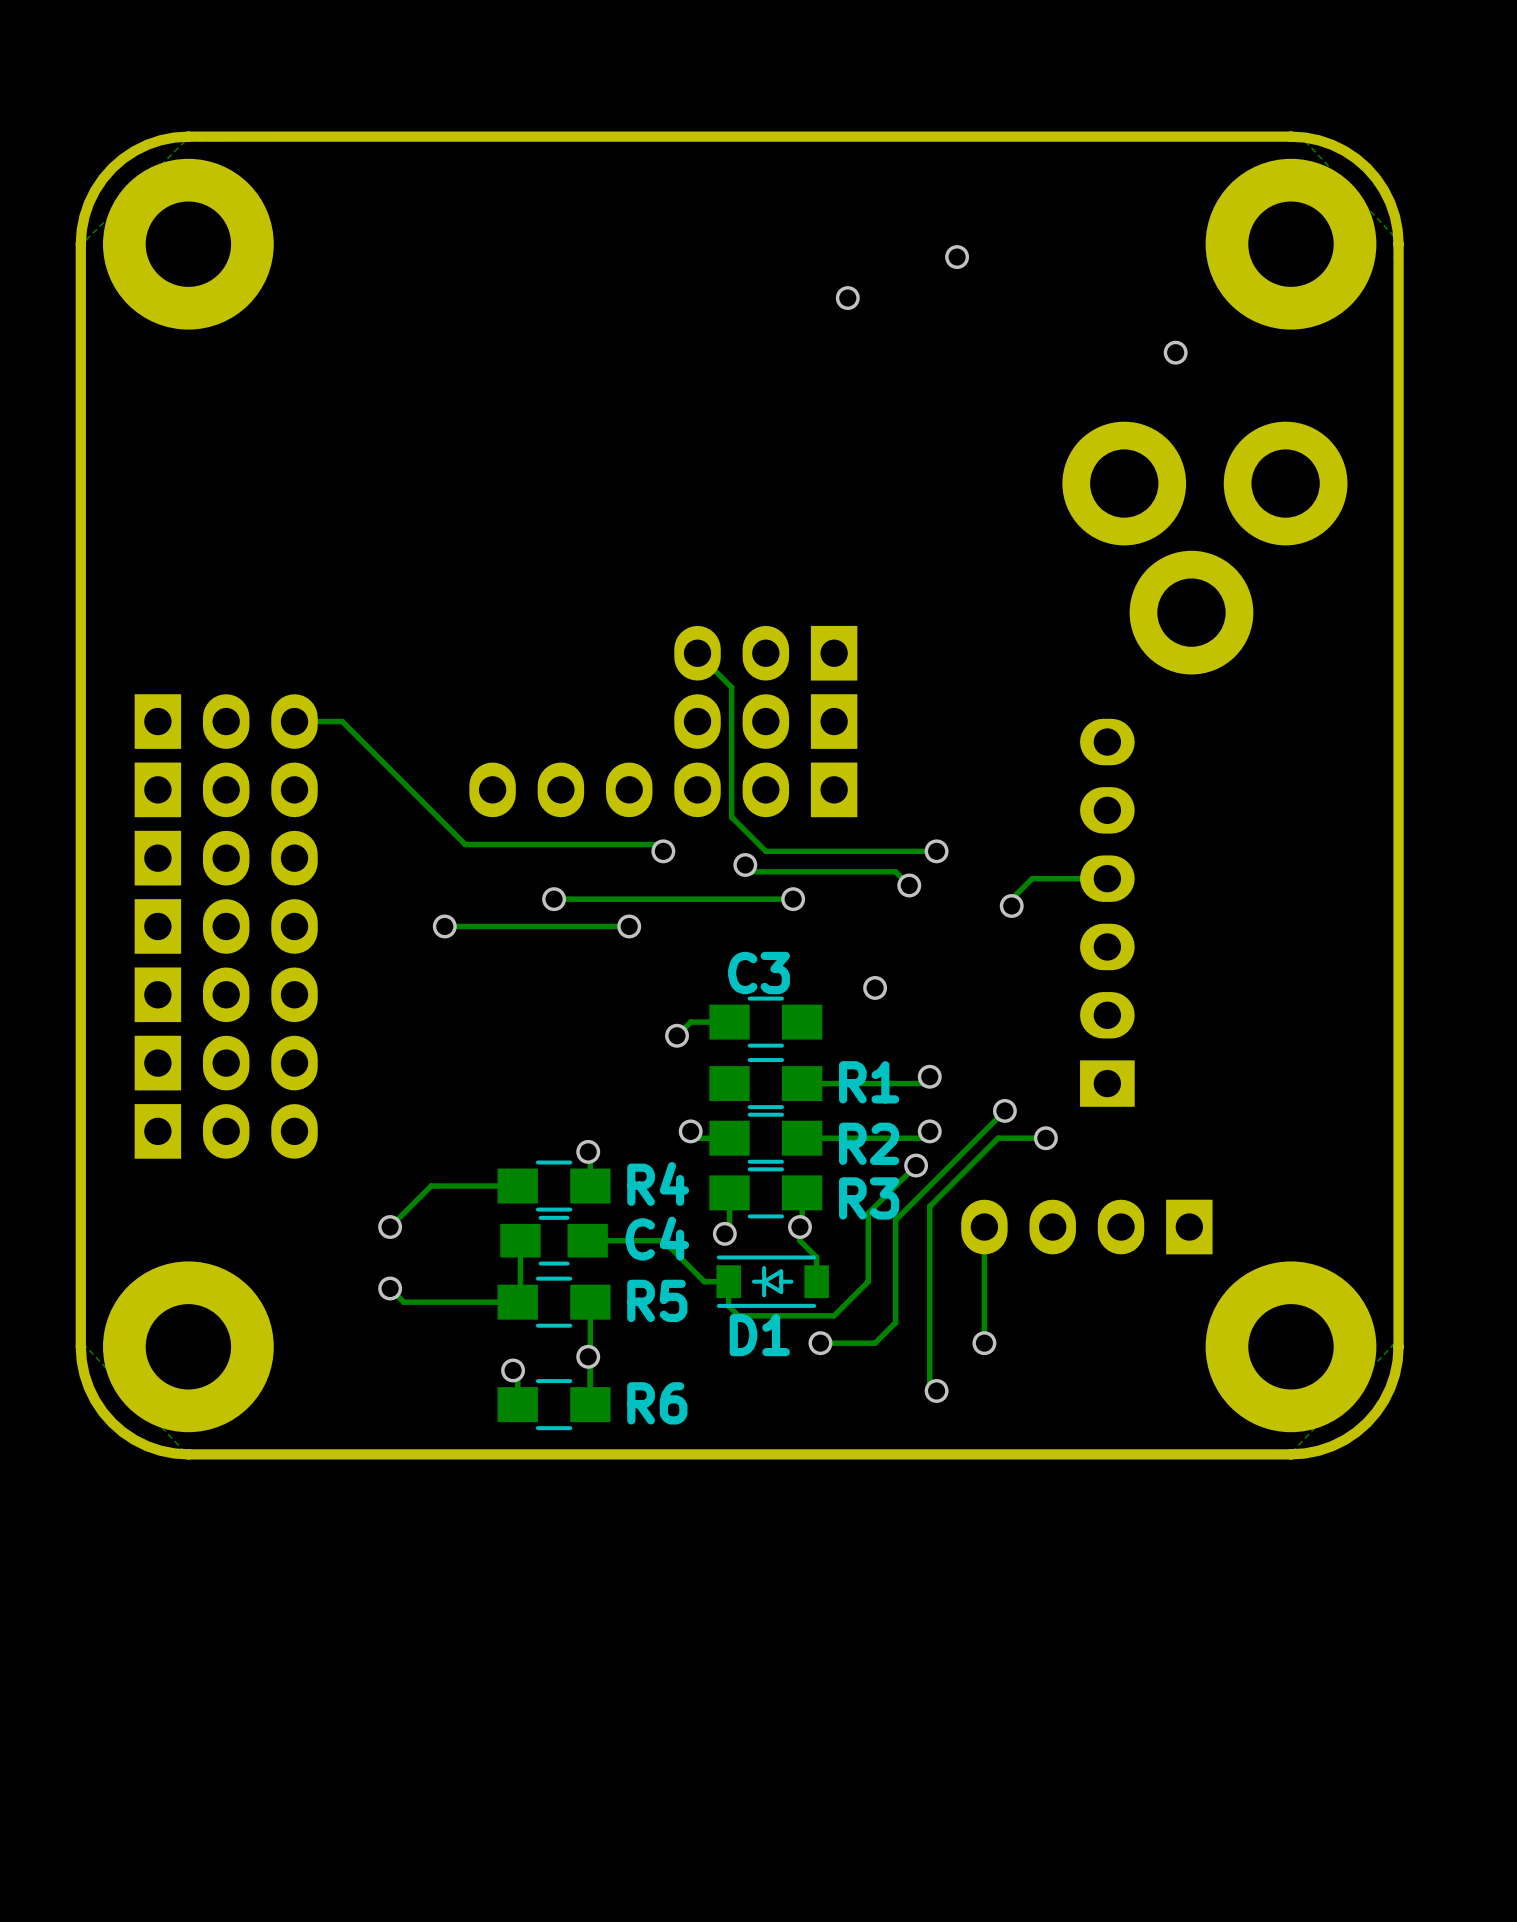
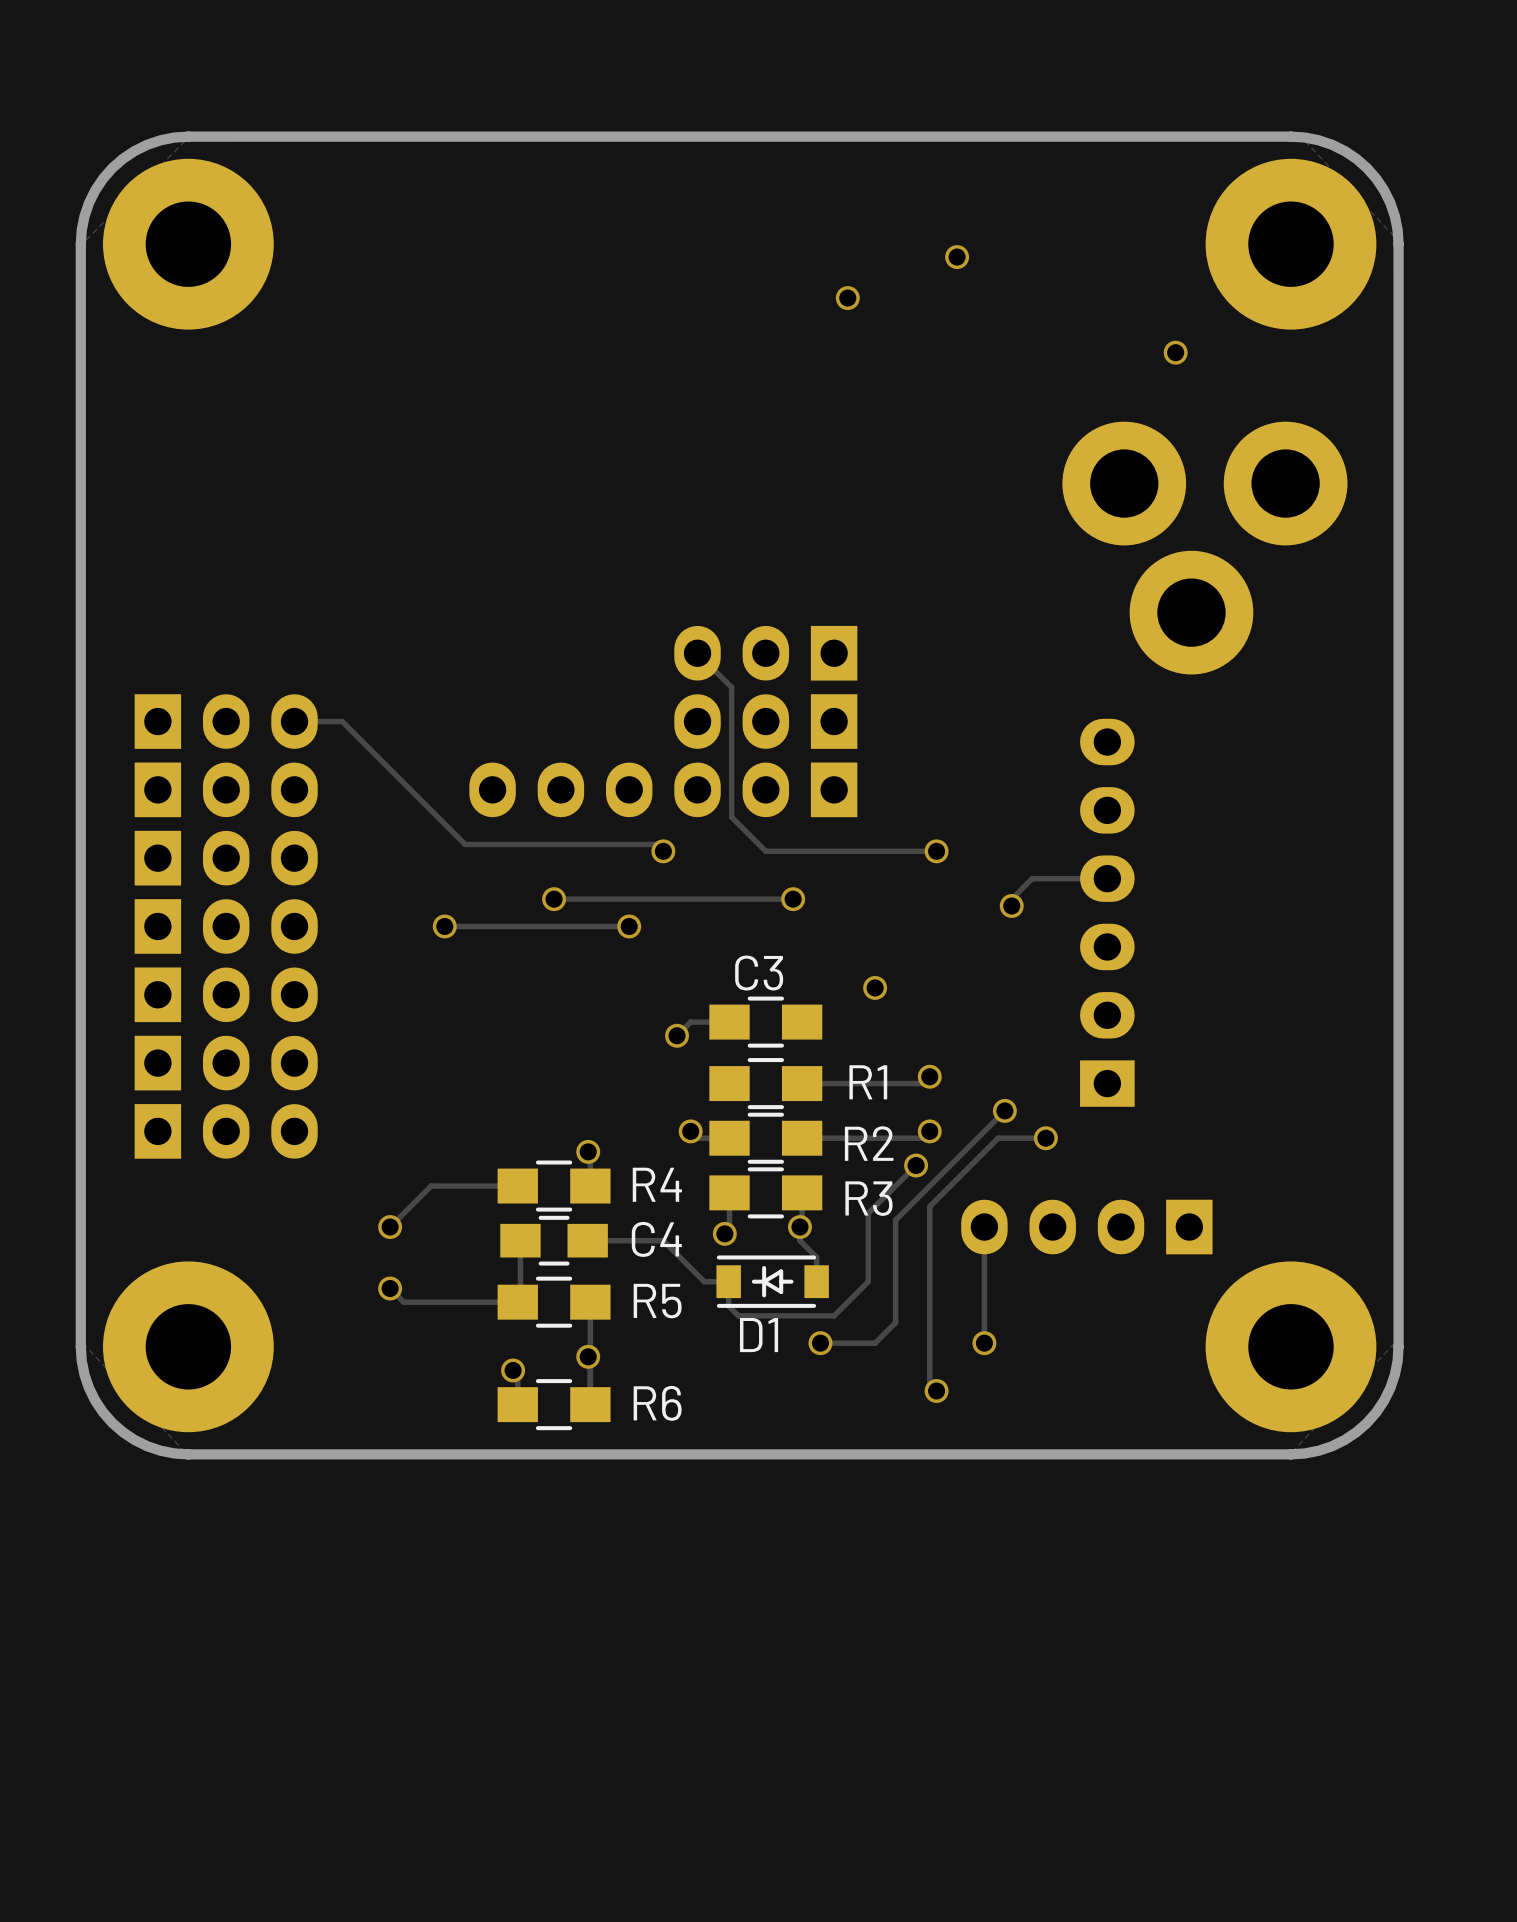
track: (745, 865) (752, 871) (895, 871) (909, 885) -> none
via: (745, 865) -> none
via: (909, 885) -> none

